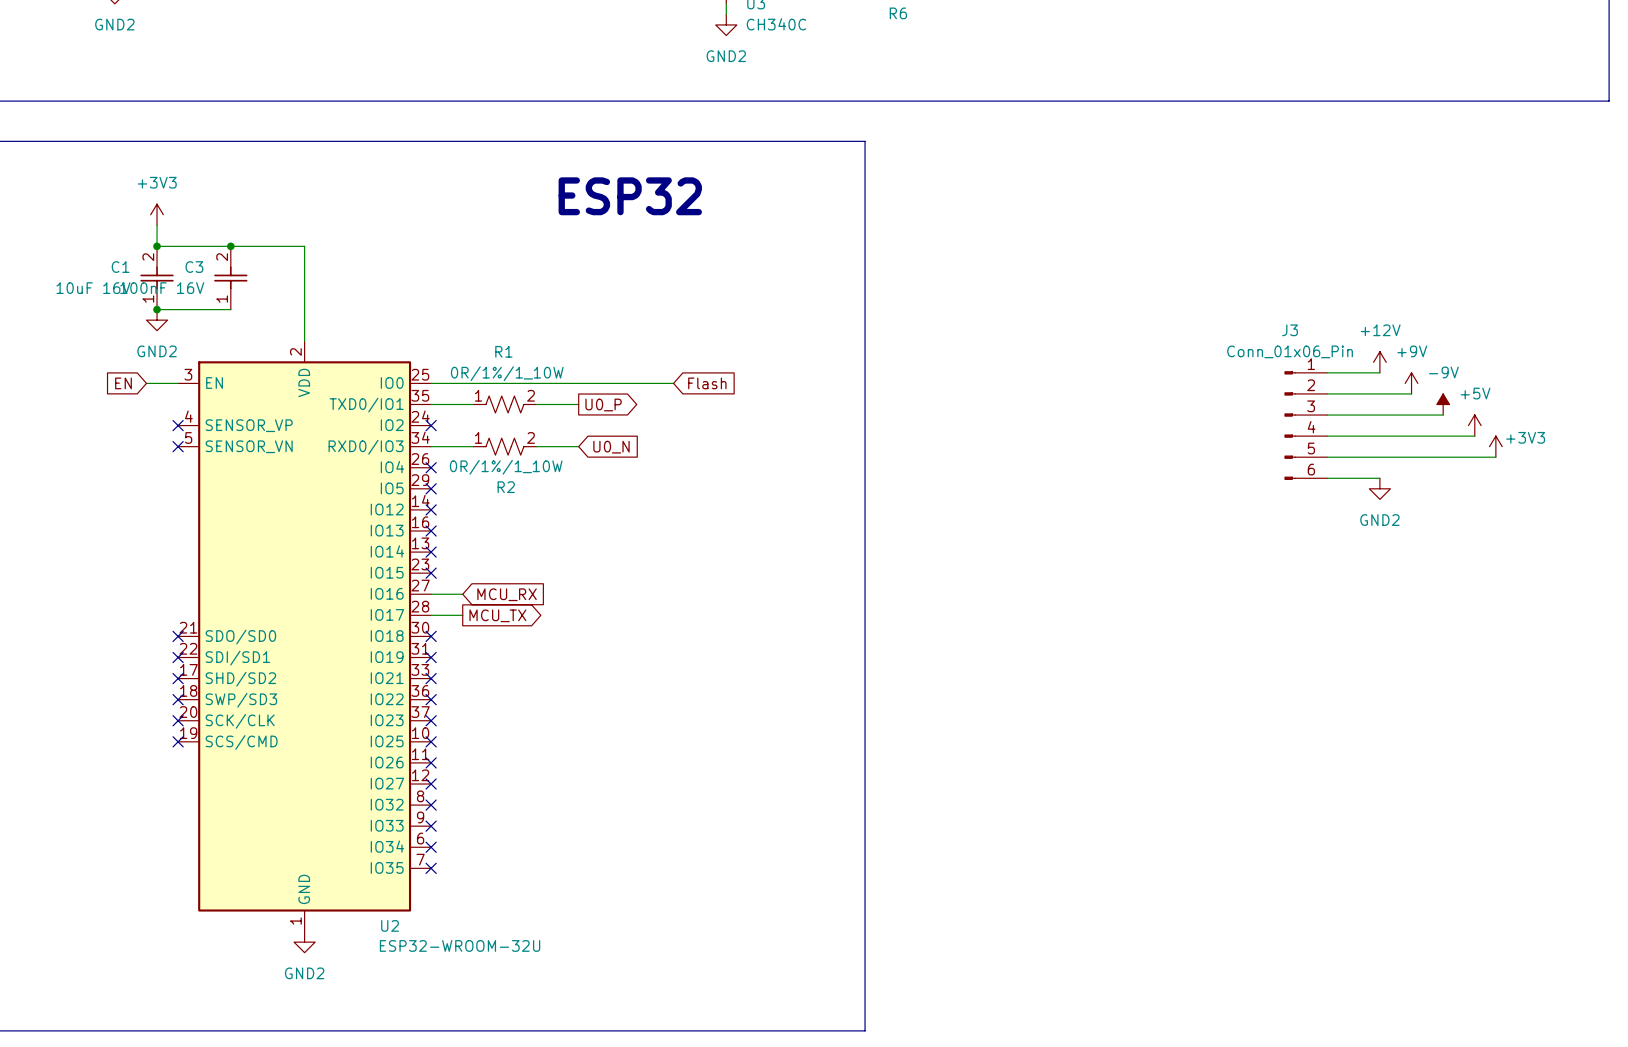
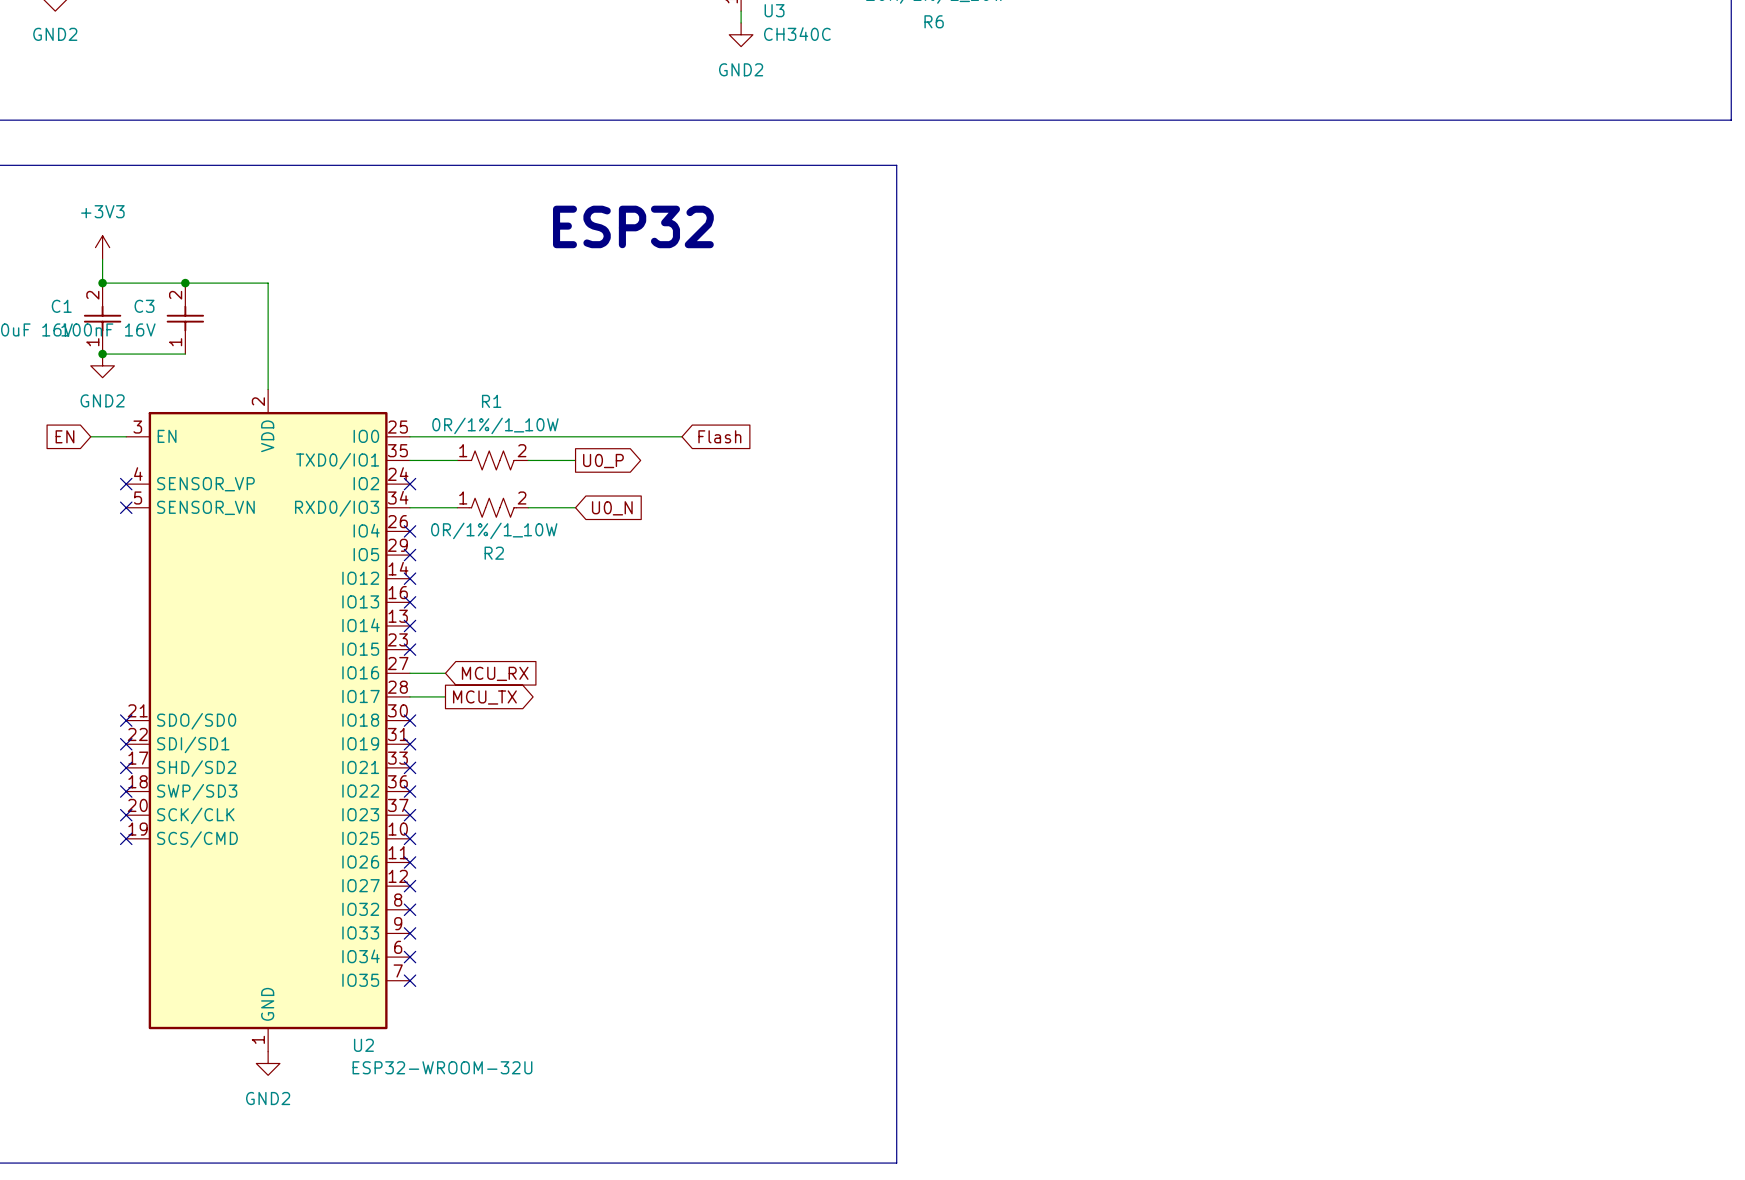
power symbol: +12V (1379, 362) -> none
wire: (1327, 372) (1379, 372) -> none
power symbol: +9V (1411, 383) -> none
wire: (1327, 393) (1411, 393) -> none
power symbol: -9V (1443, 404) -> none
wire: (1327, 415) (1443, 415) -> none
J3: Conn_01x06_Pin (1305, 425) -> none
power symbol: +5V (1474, 425) -> none
wire: (1327, 436) (1474, 436) -> none
power symbol: +3V3 (1495, 446) -> none
wire: (1327, 457) (1495, 457) -> none
wire: (1327, 478) (1379, 478) -> none
power symbol: GND2 (1379, 488) -> none

